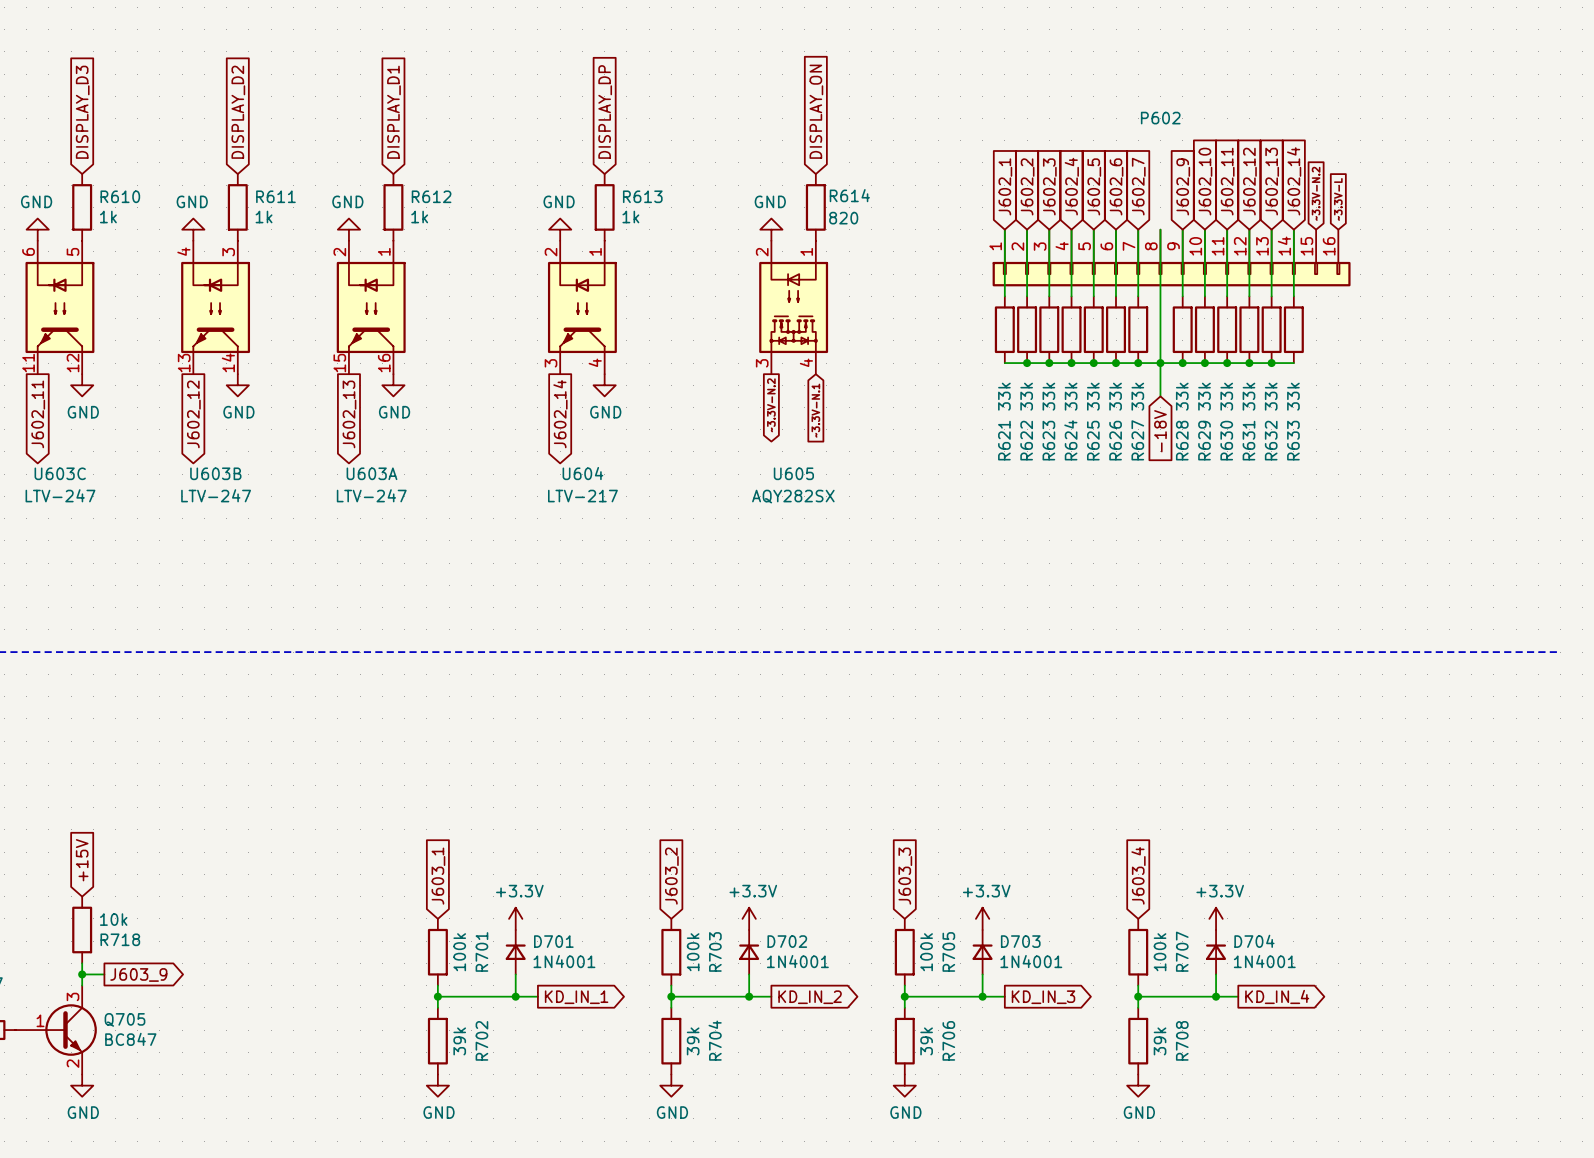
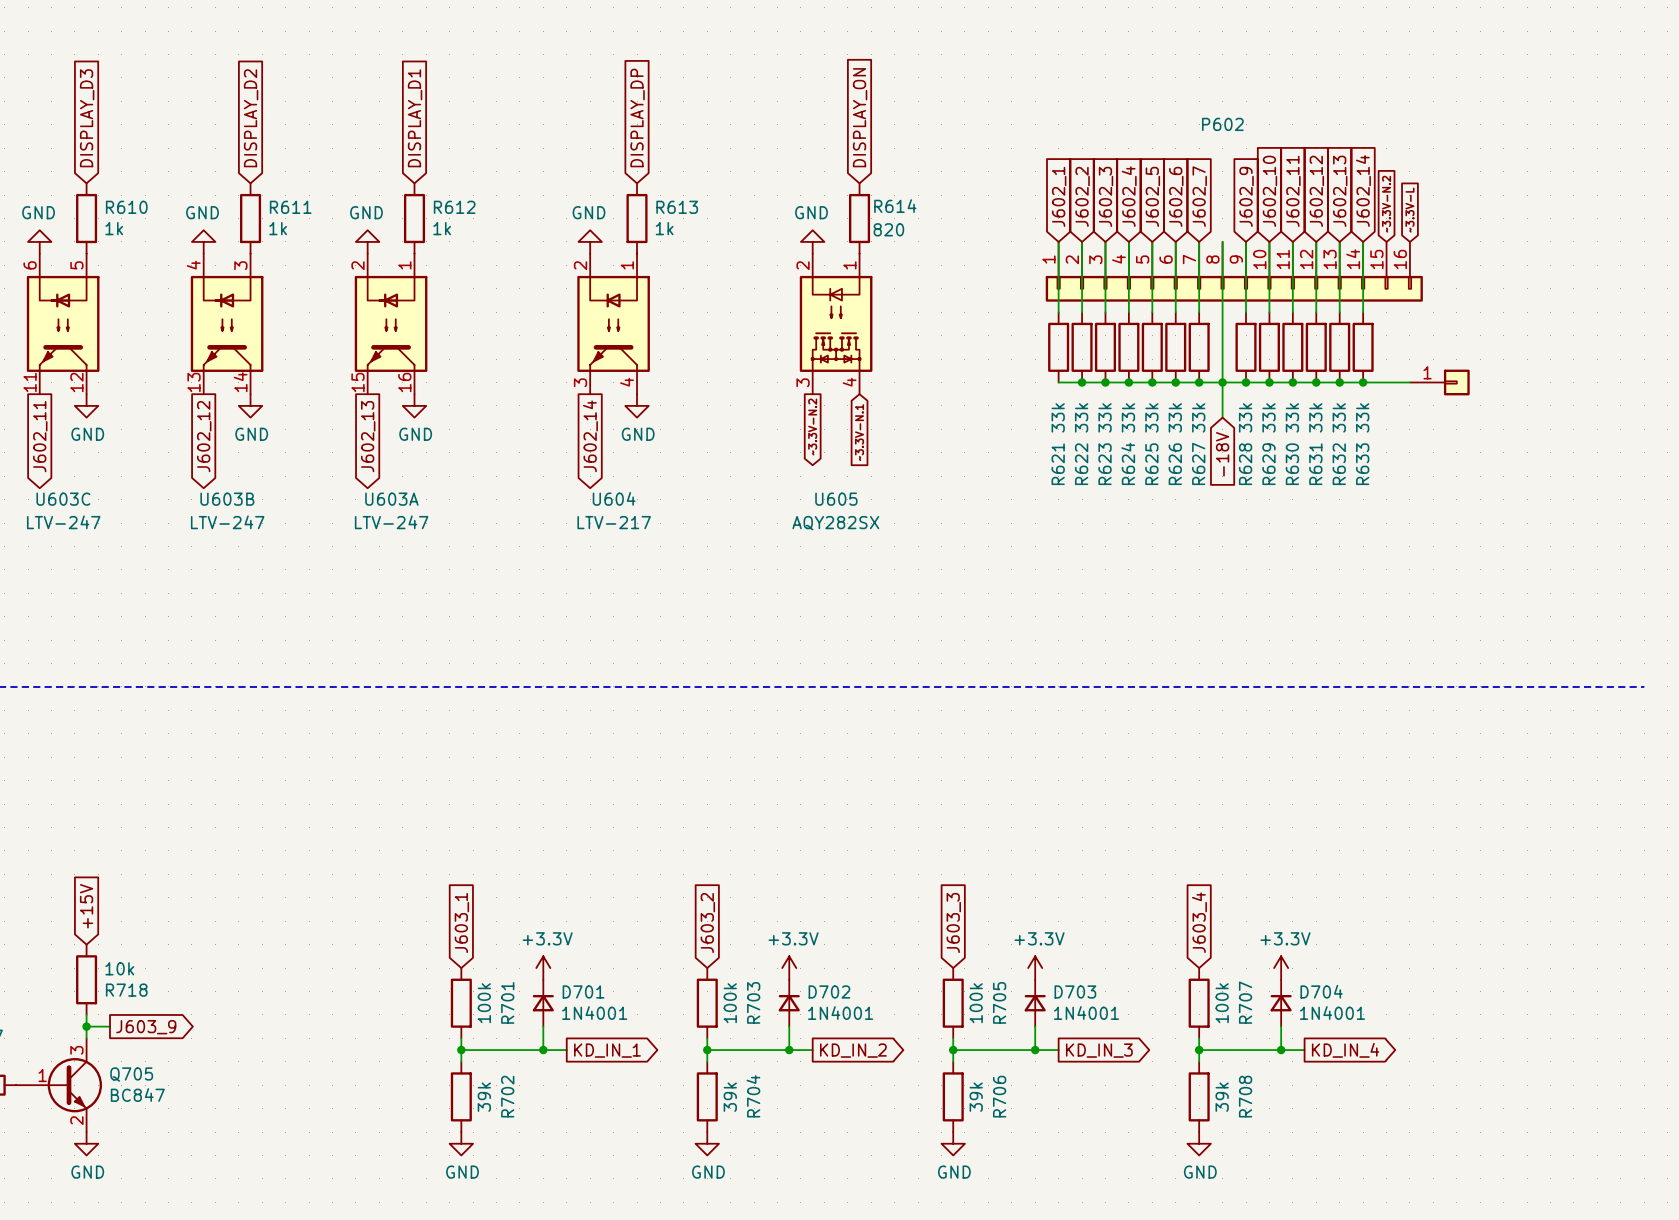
wire: none -> (1363, 382) (1409, 382)
junction: none -> (1363, 382)
part: none -> (1439, 382)

